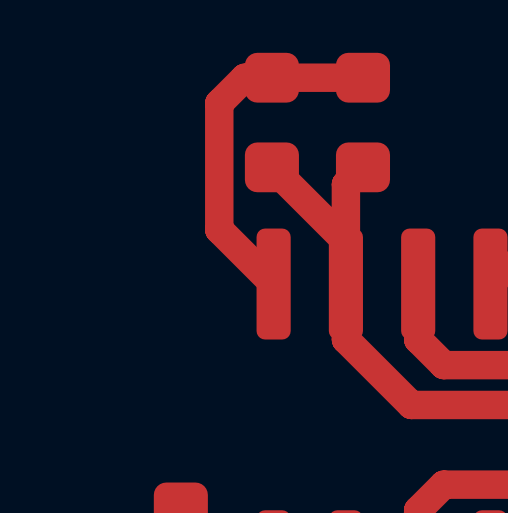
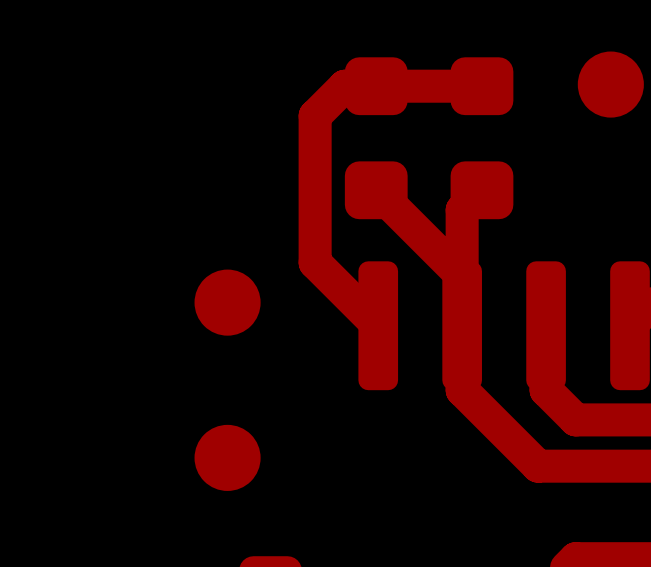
part: none -> (610, 84)
part: none -> (227, 302)
part: none -> (227, 457)

